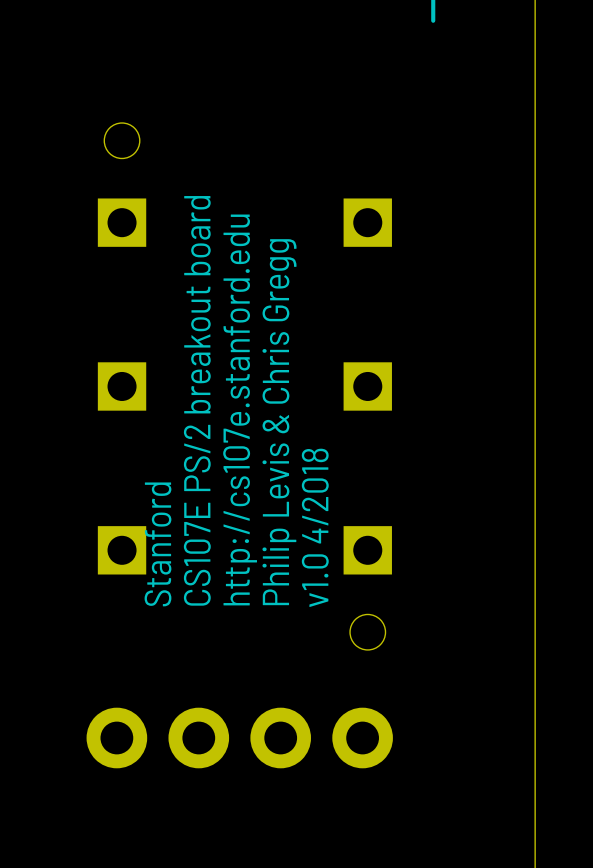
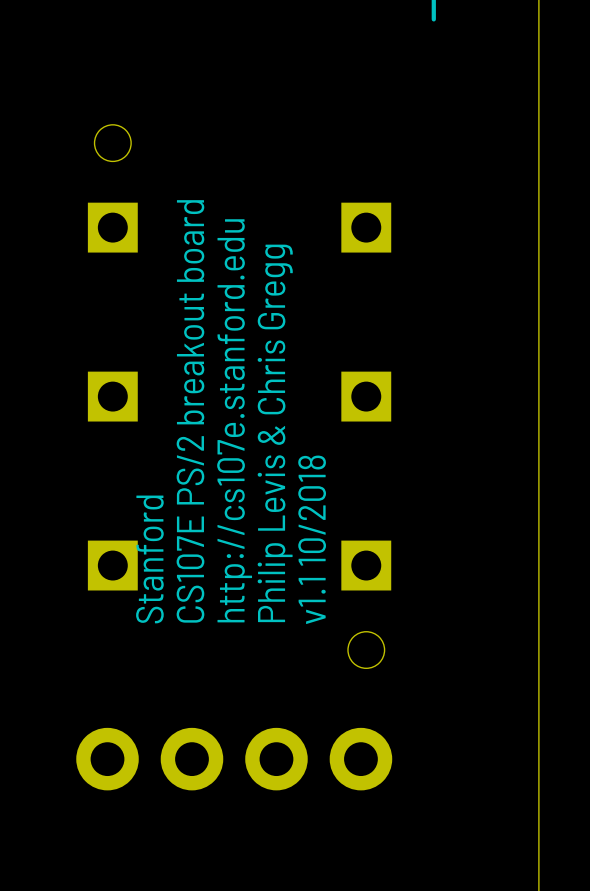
text: v1.0 4/2018 (315, 527) -> v1.1 10/2018 (312, 539)

